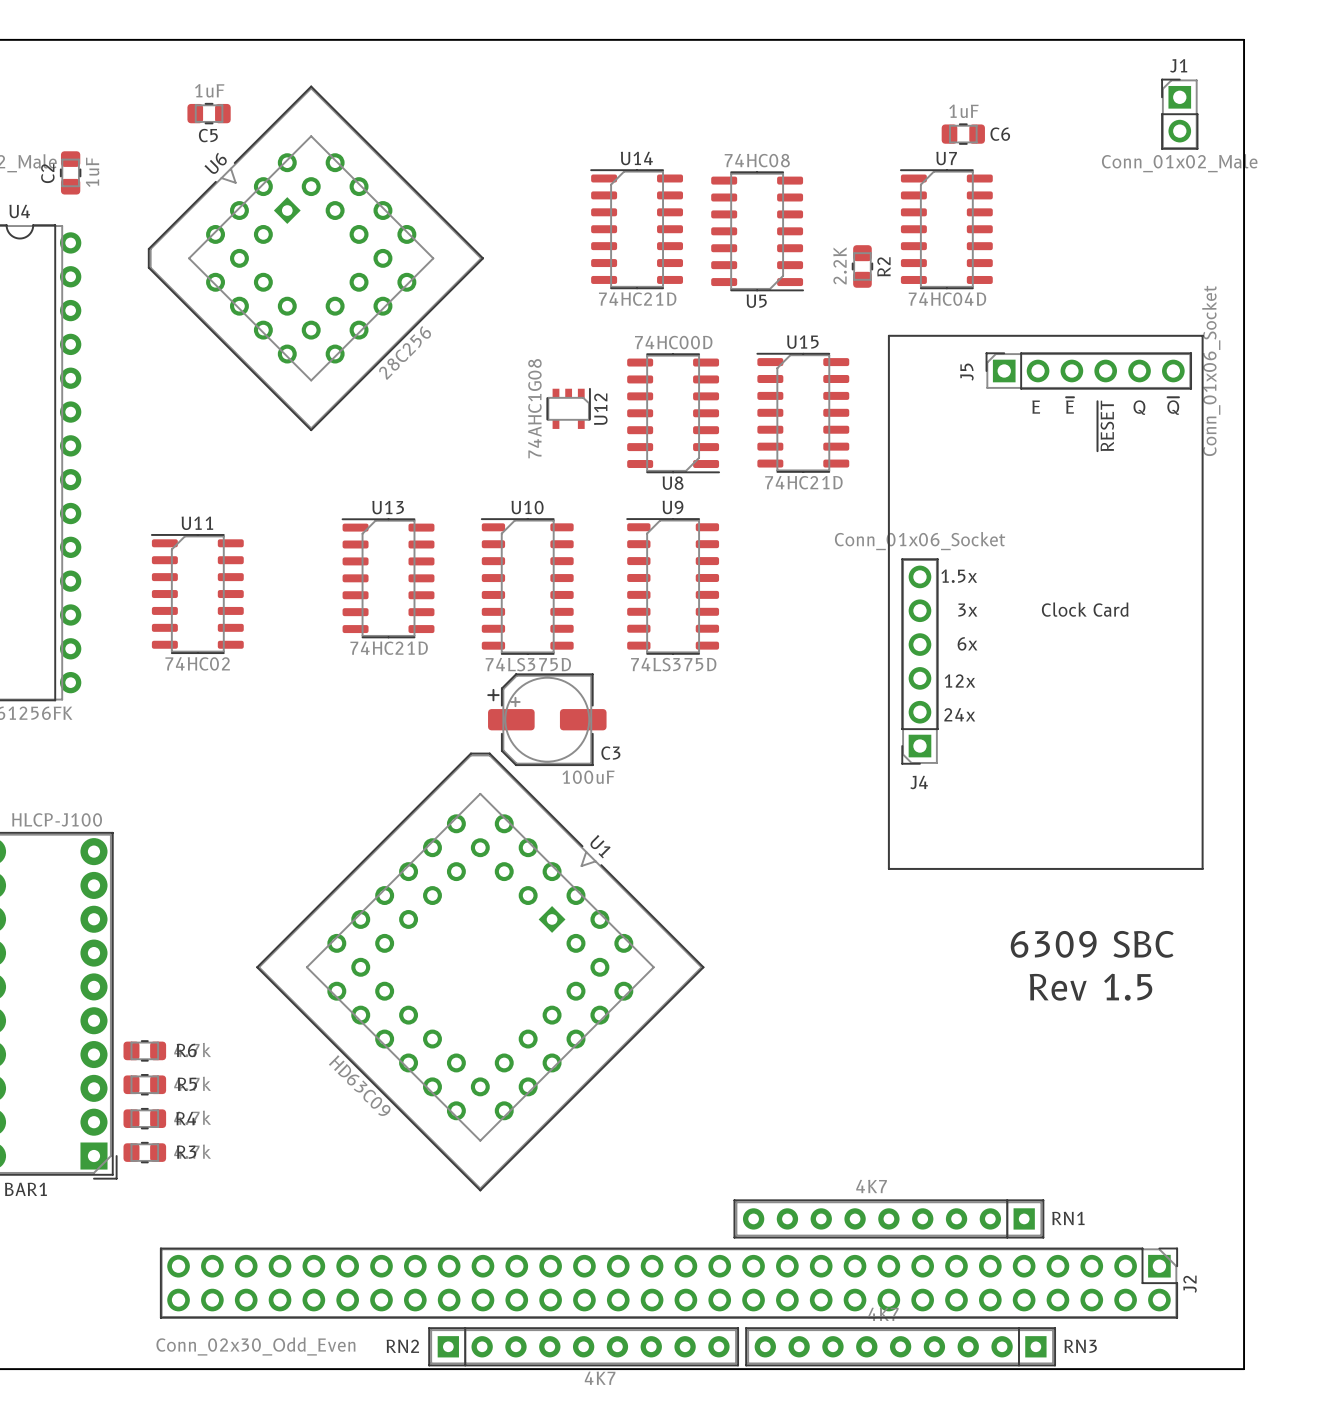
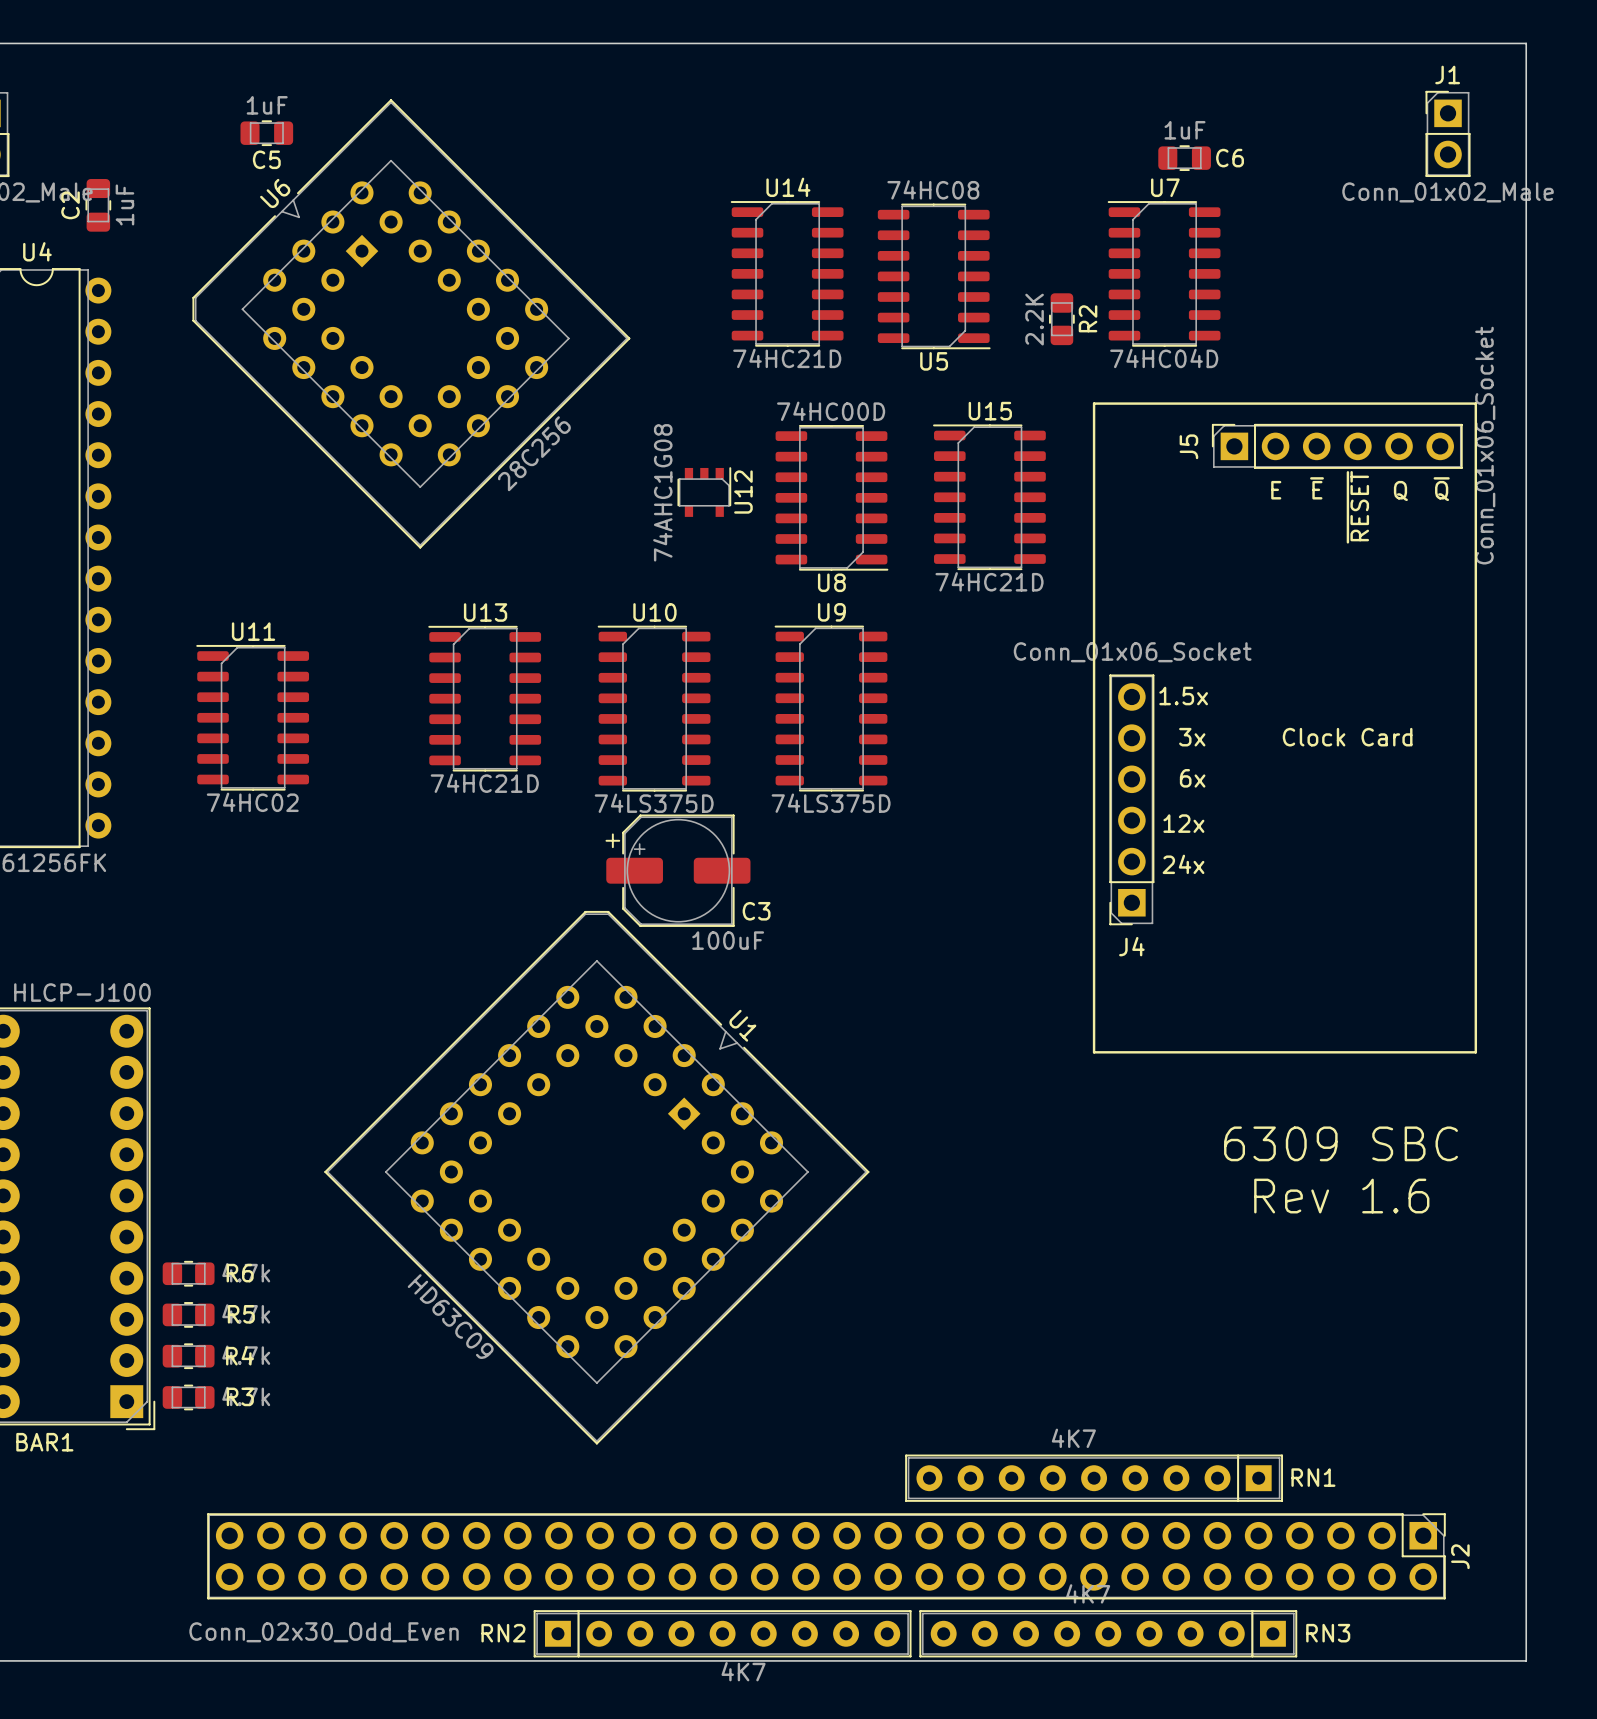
U6 footprint: [147, 85, 484, 432] -> [192, 99, 631, 549]
text: Rev 1.5 (1091, 987) -> Rev 1.6 (1341, 1196)

